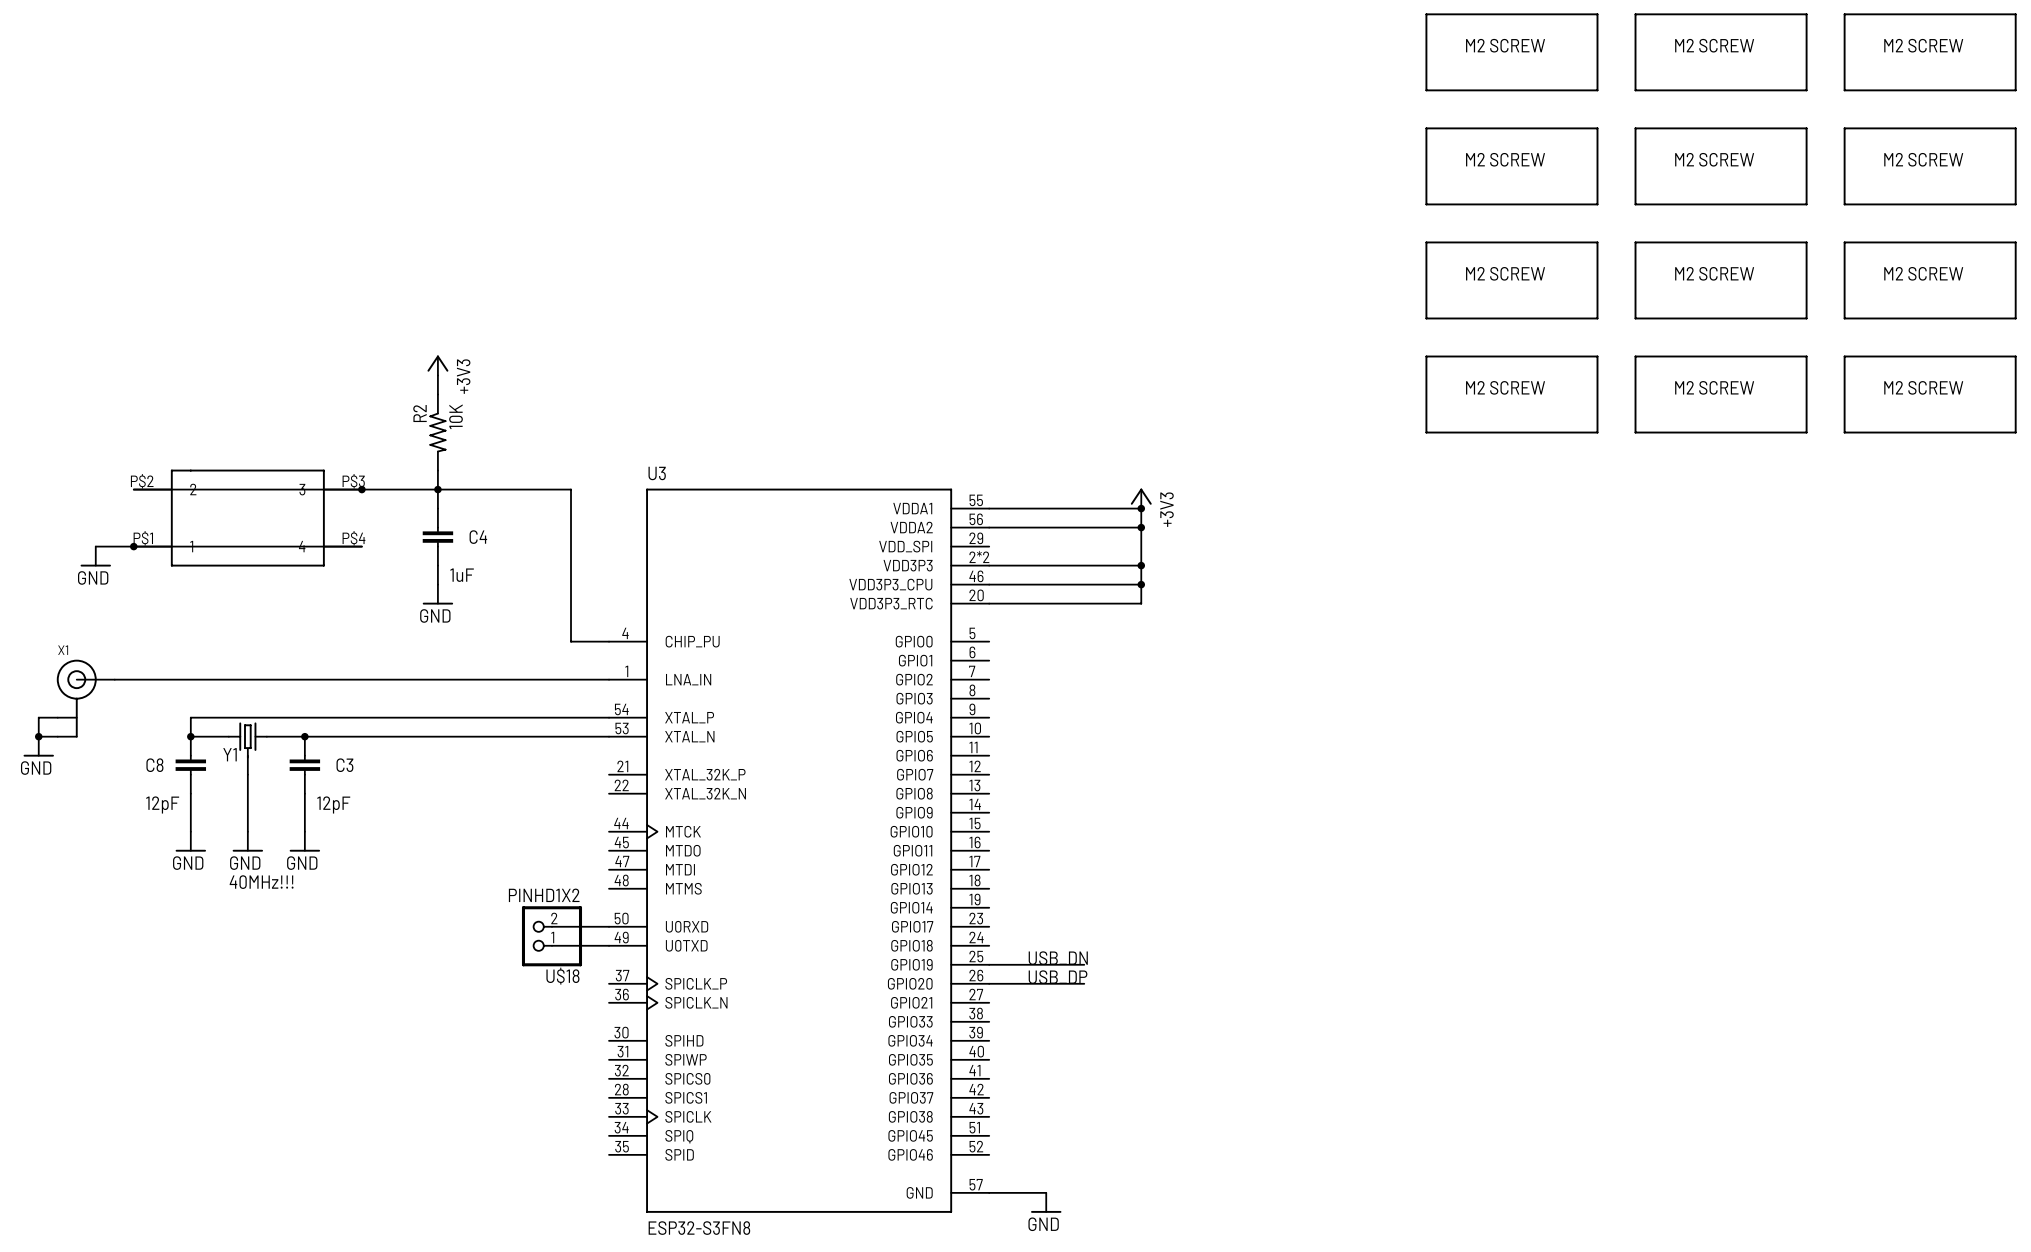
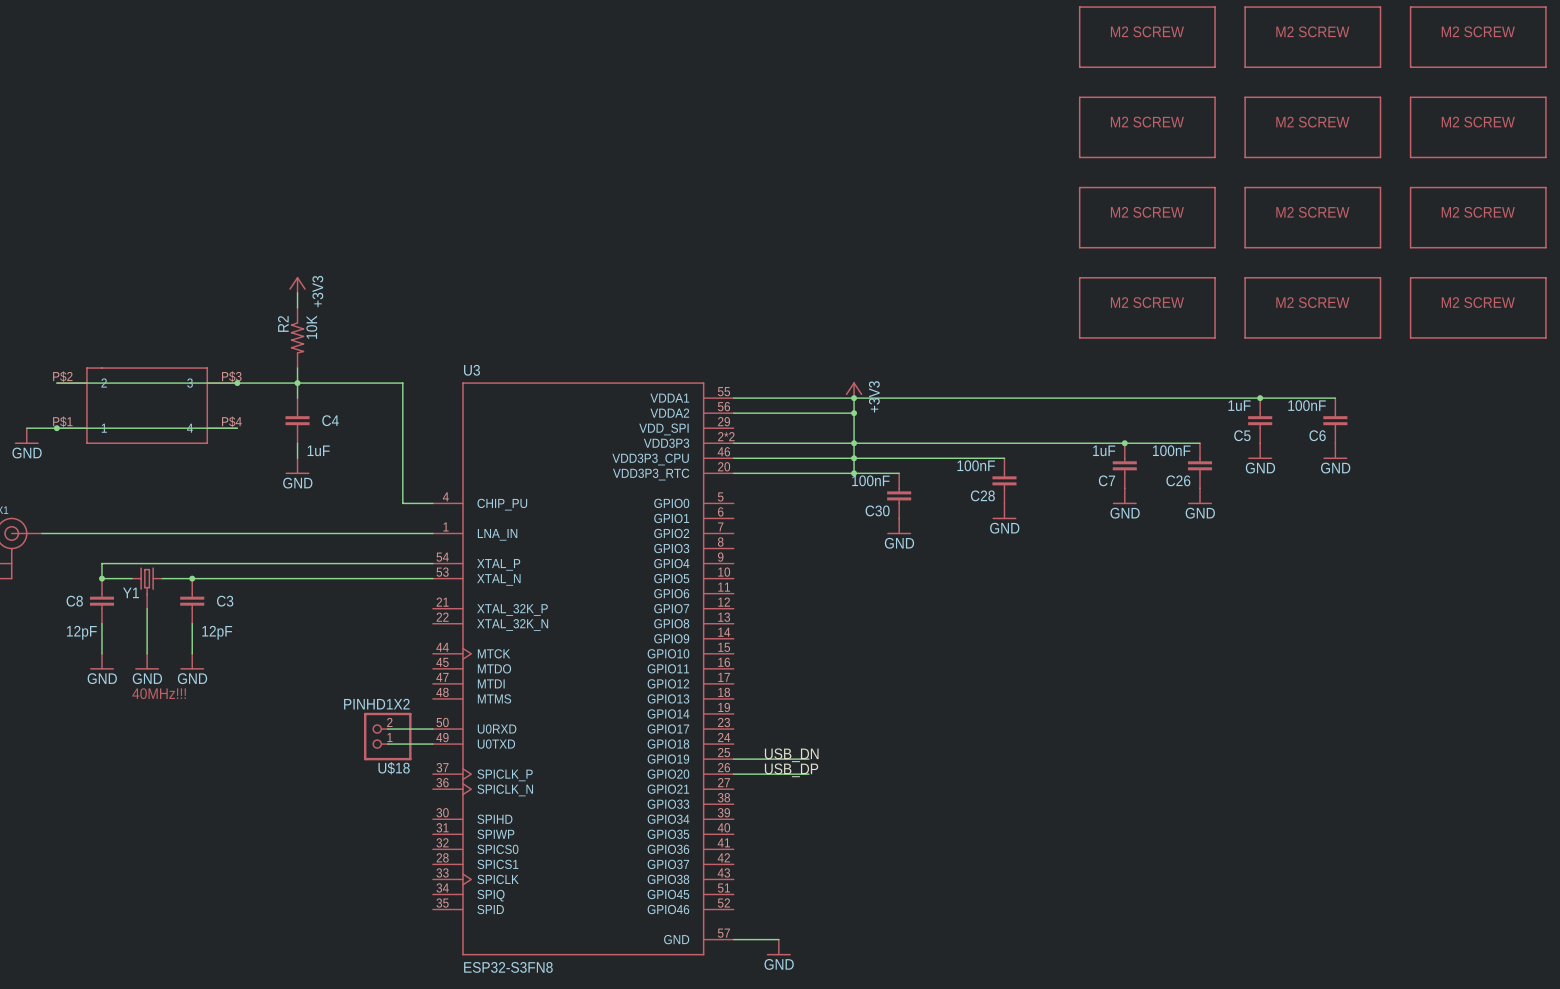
wire: none -> (854, 398) (1335, 398)
junction: none -> (1260, 398)
C5: none -> 1uF (1260, 420)
C6: none -> 100nF (1335, 420)
wire: none -> (854, 443) (1200, 443)
junction: none -> (1124, 443)
power symbol: none -> GND (1260, 451)
power symbol: none -> GND (1335, 451)
wire: none -> (854, 458) (1004, 458)
C7: none -> 1uF (1124, 465)
C26: none -> 100nF (1200, 465)
wire: none -> (854, 473) (899, 473)
junction: none -> (854, 473)
C28: none -> 100nF (1004, 480)
C30: none -> 100nF (899, 495)
power symbol: none -> GND (1124, 496)
power symbol: none -> GND (1200, 496)
power symbol: none -> GND (1004, 511)
power symbol: none -> GND (899, 526)

